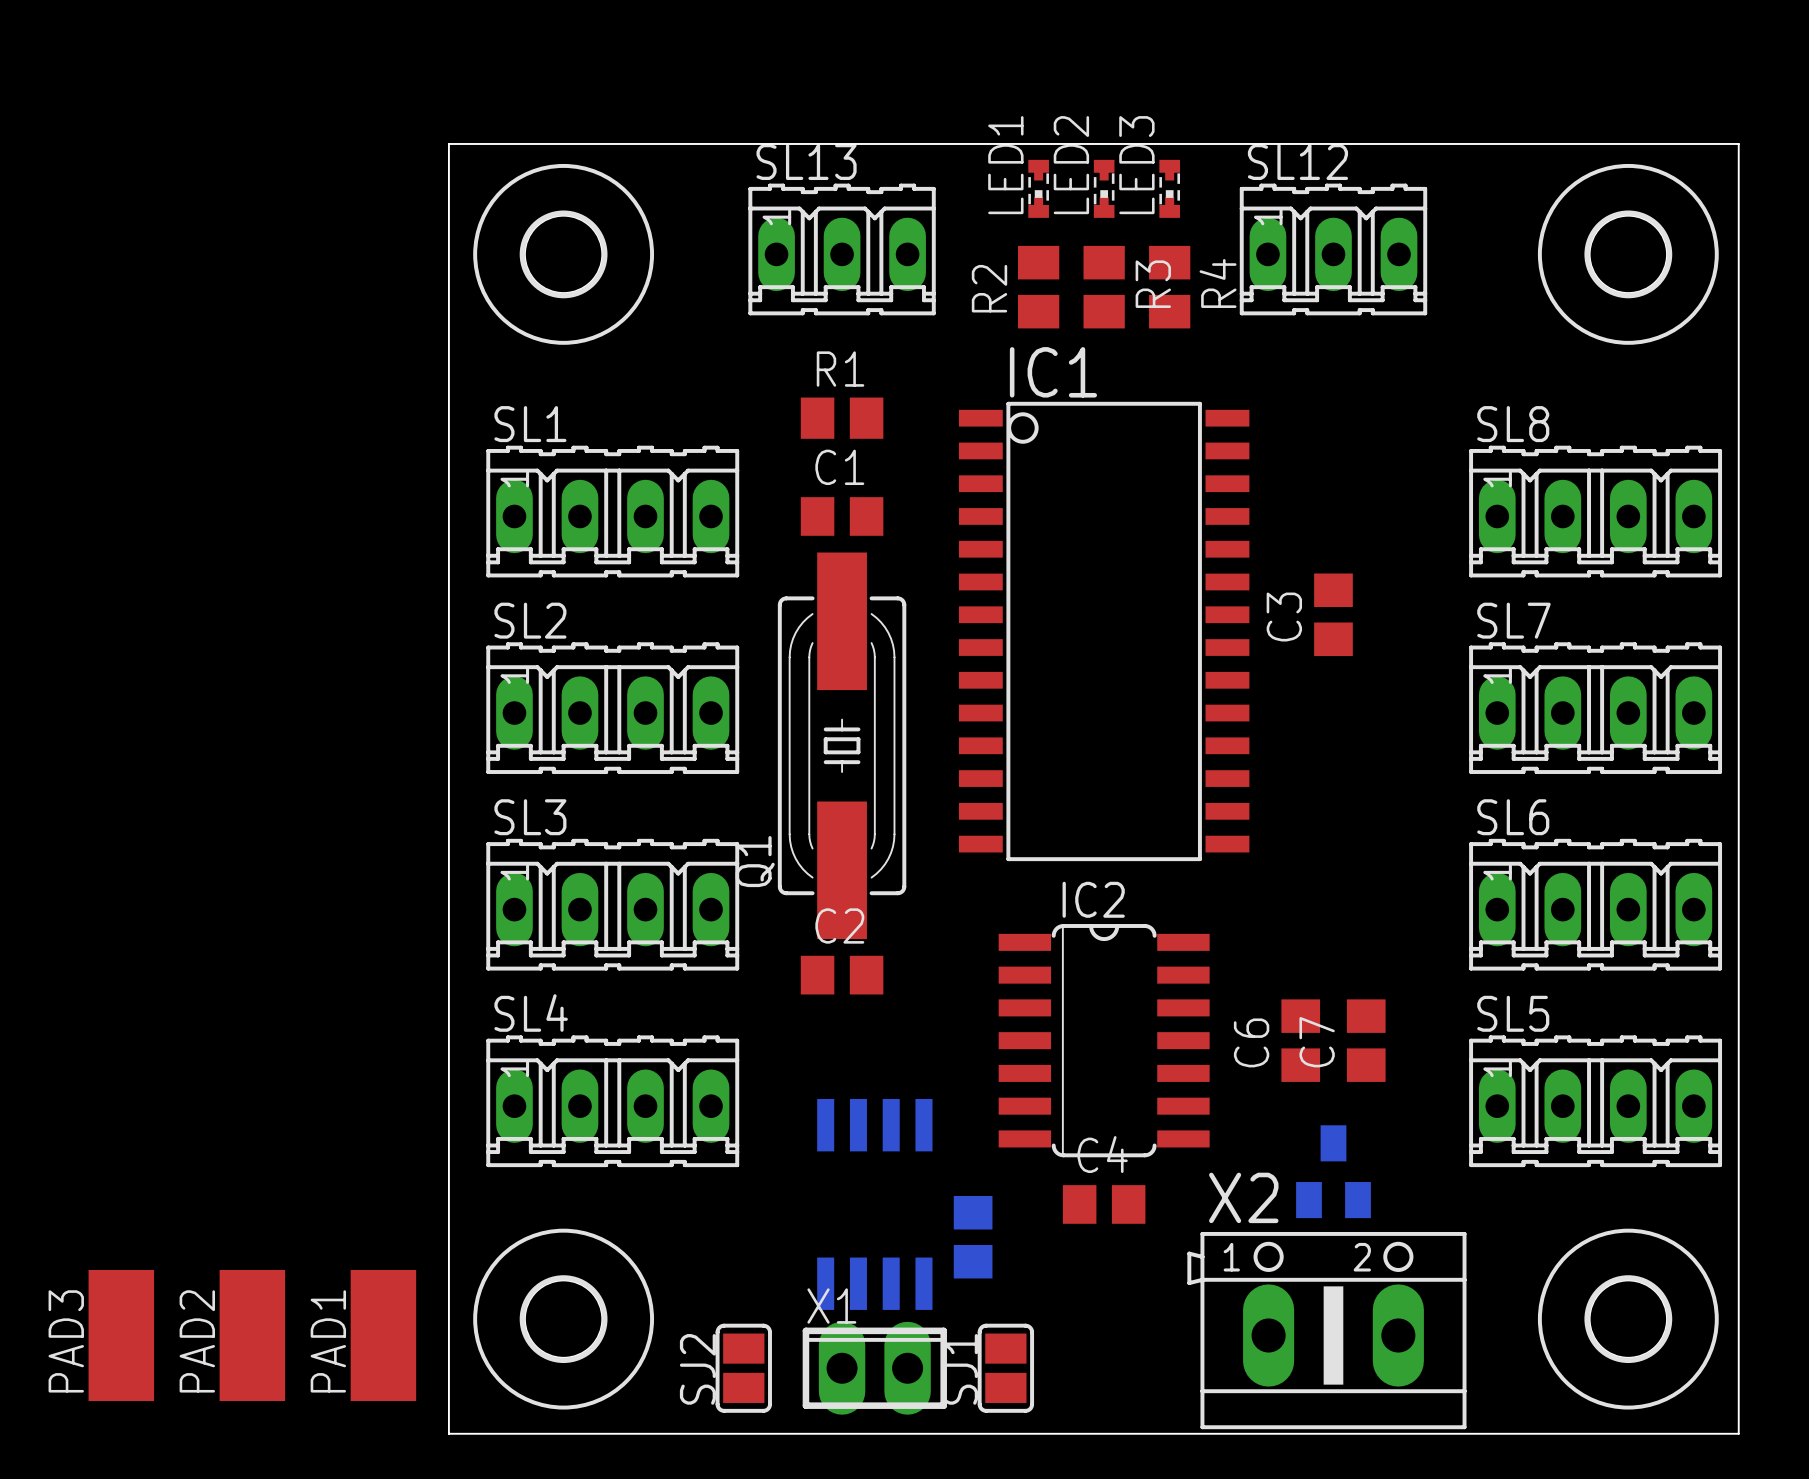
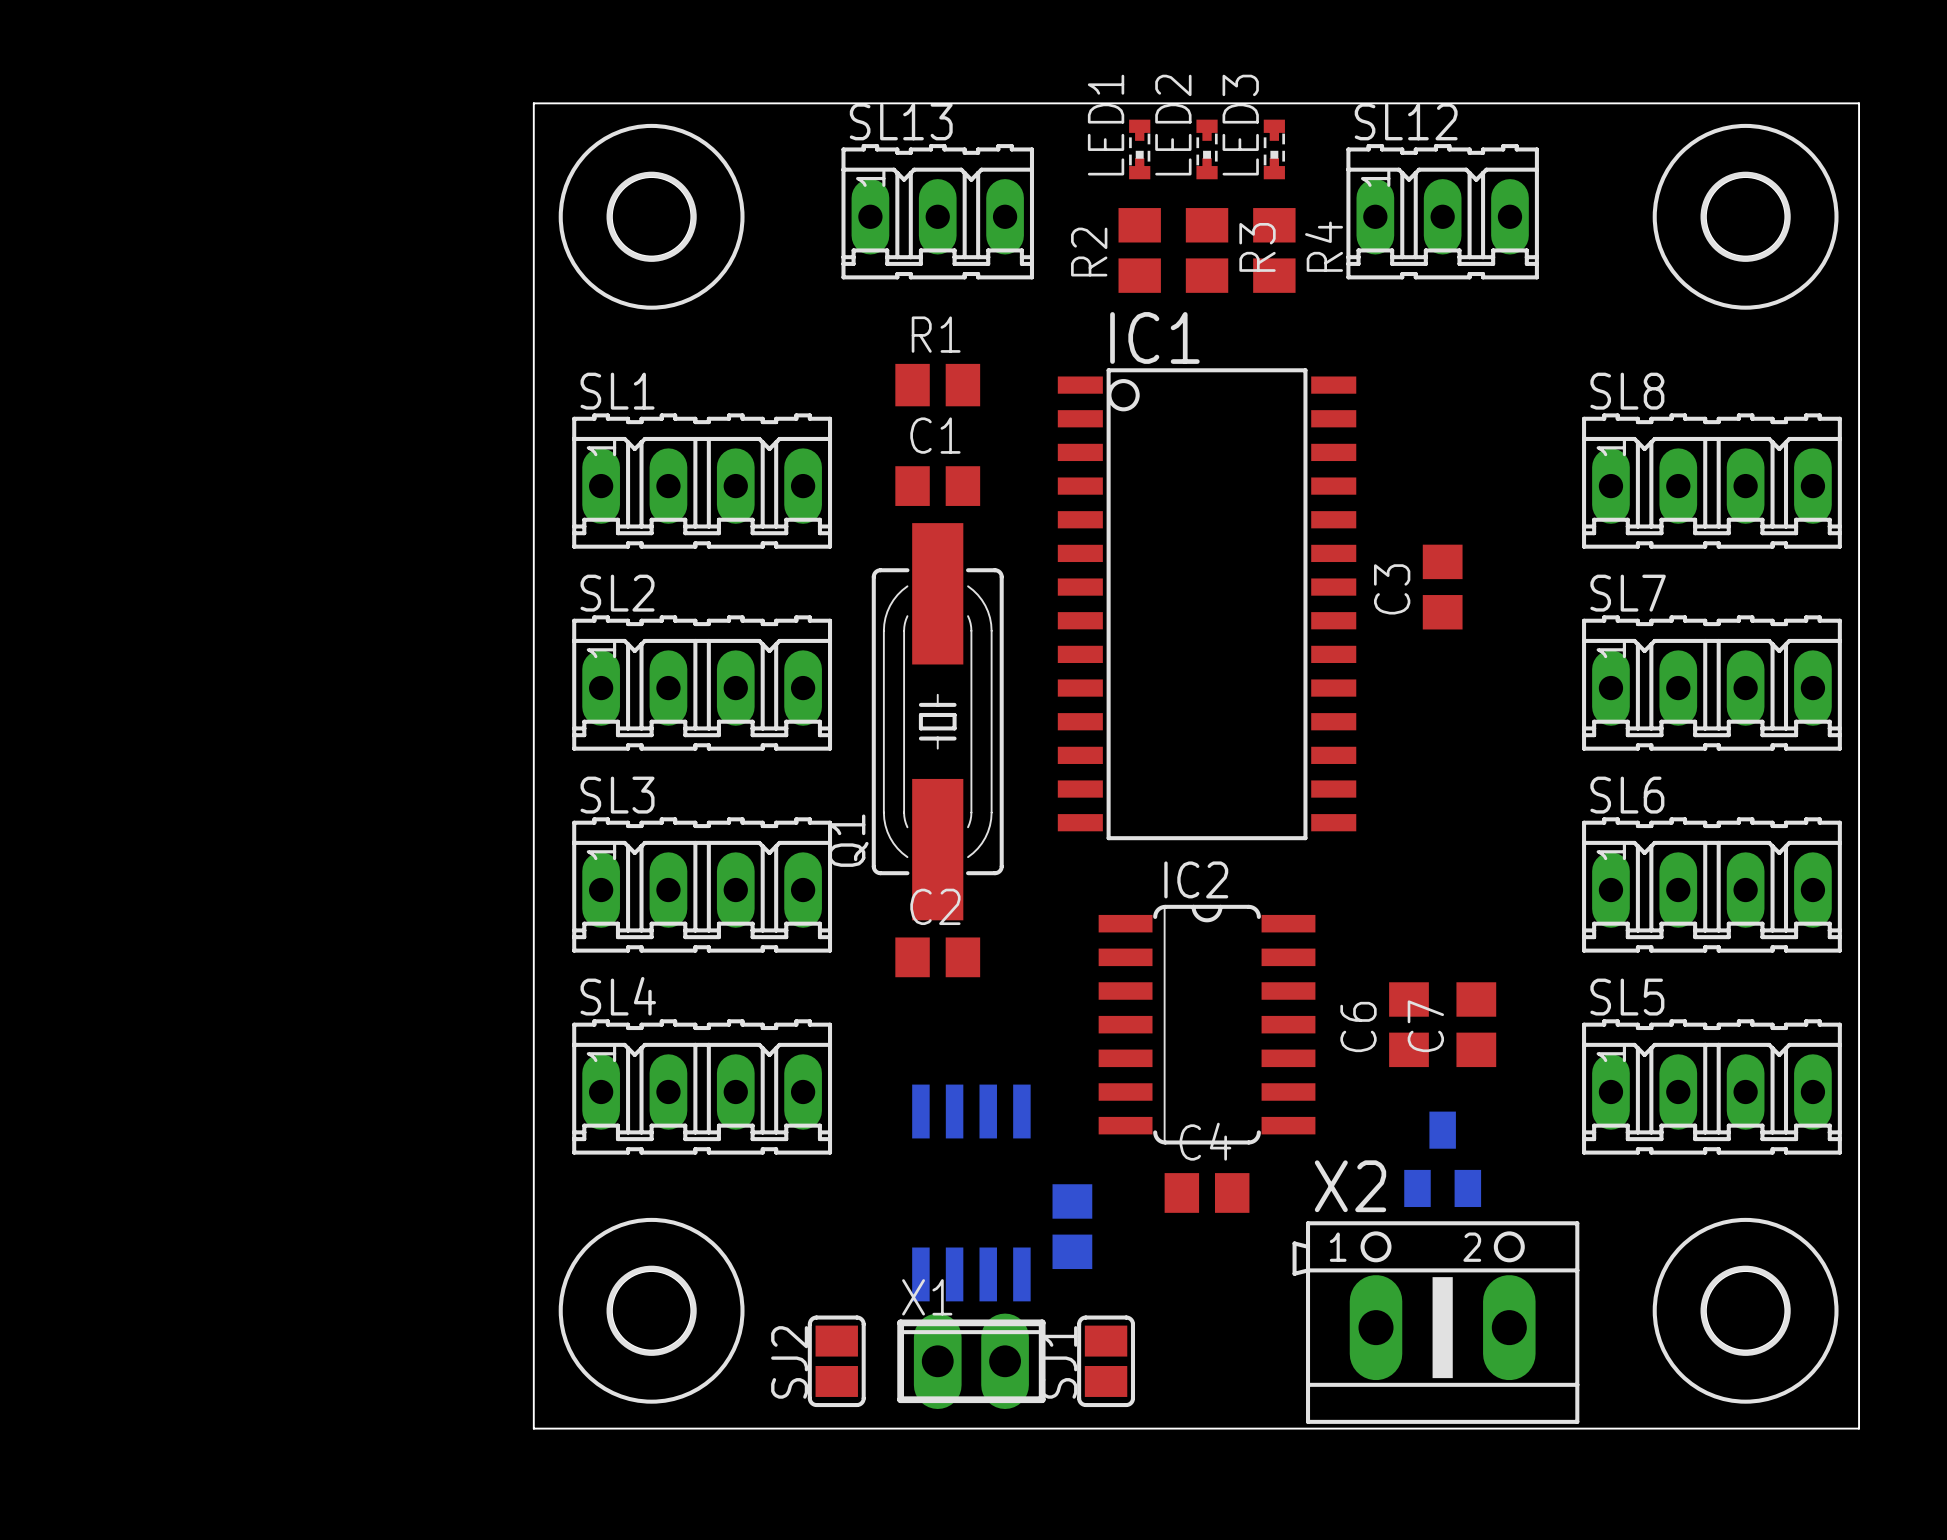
PAD3: (121, 1335) -> none
PAD2: (252, 1335) -> none
PAD1: (383, 1335) -> none

